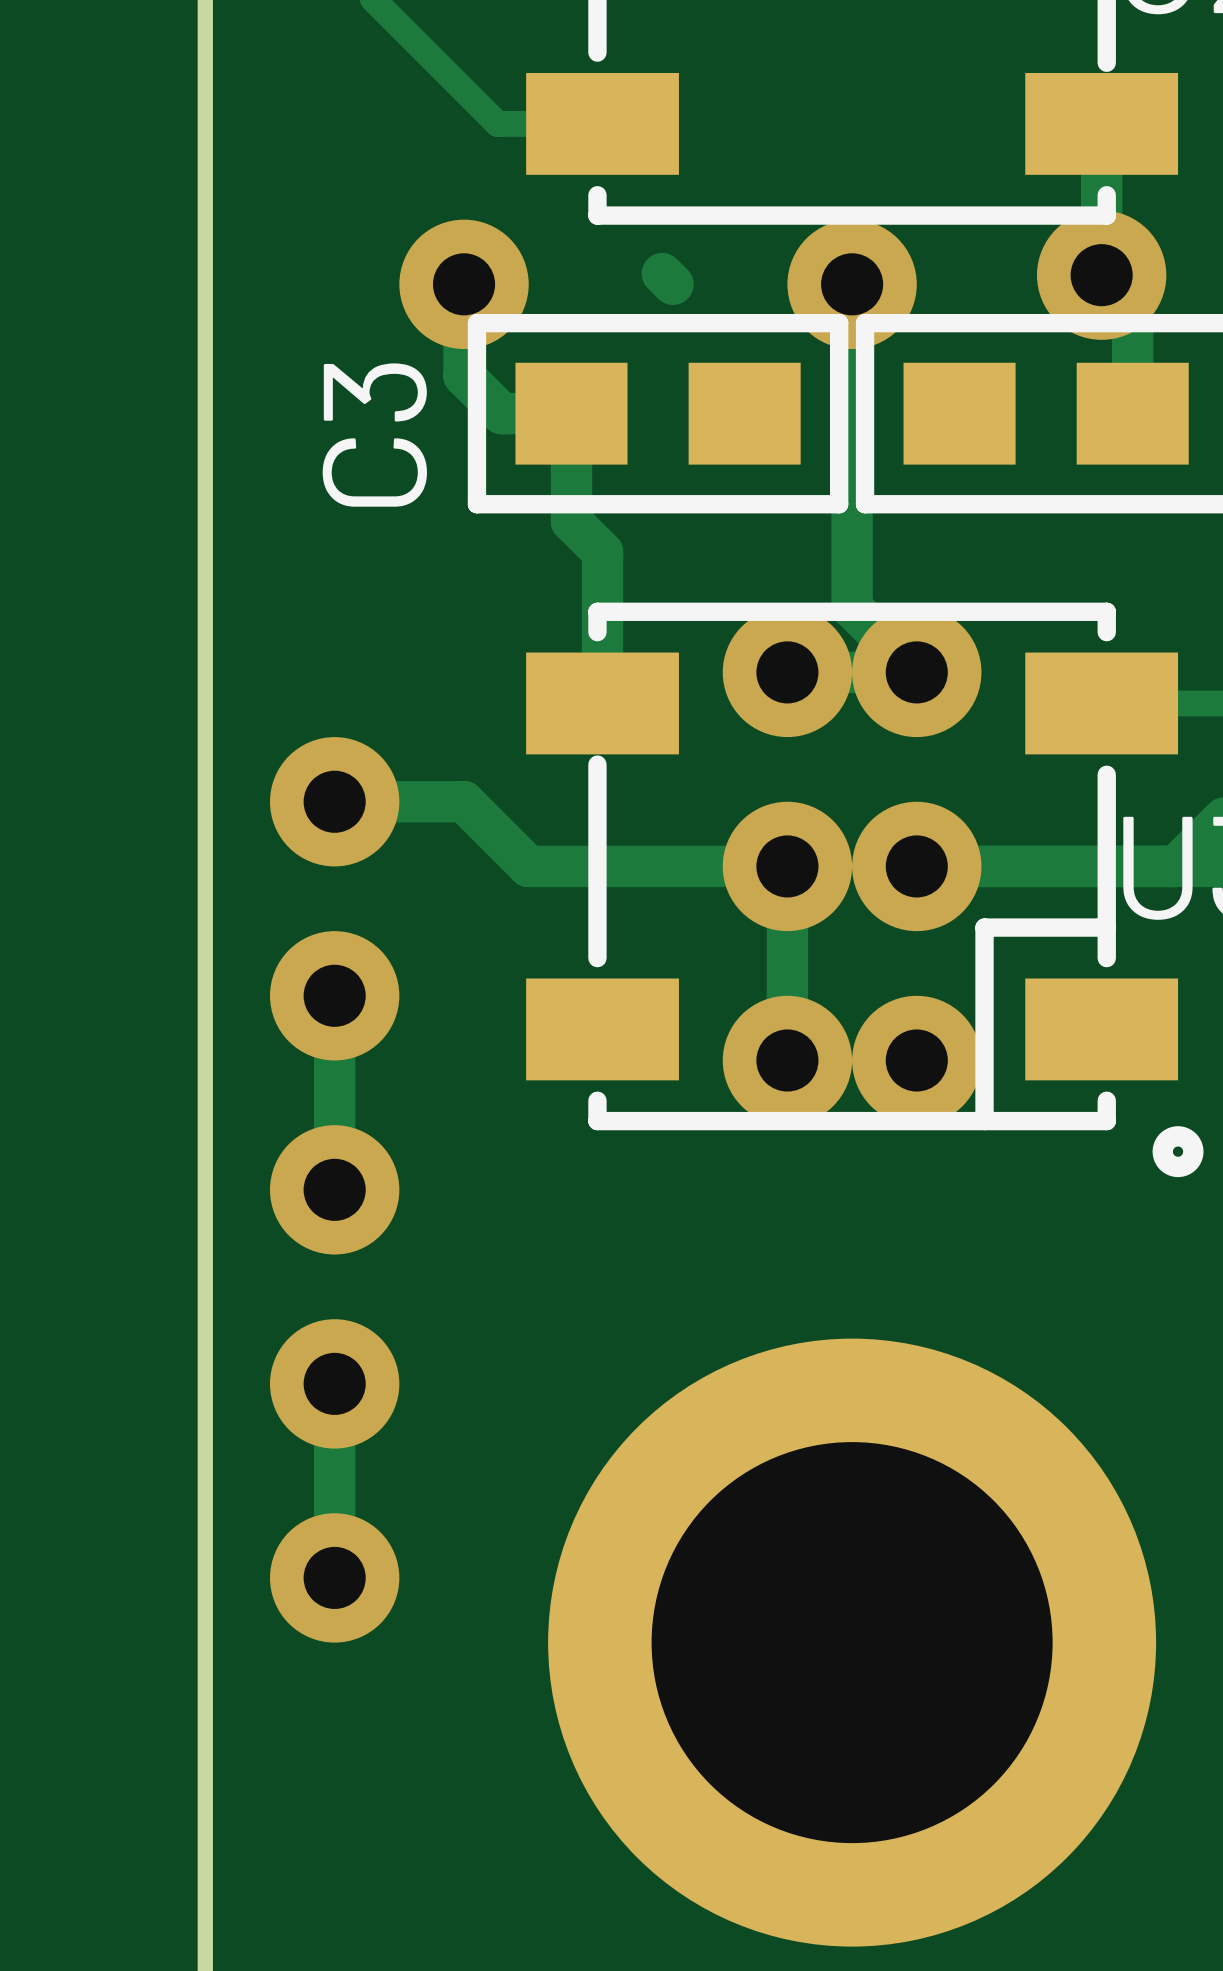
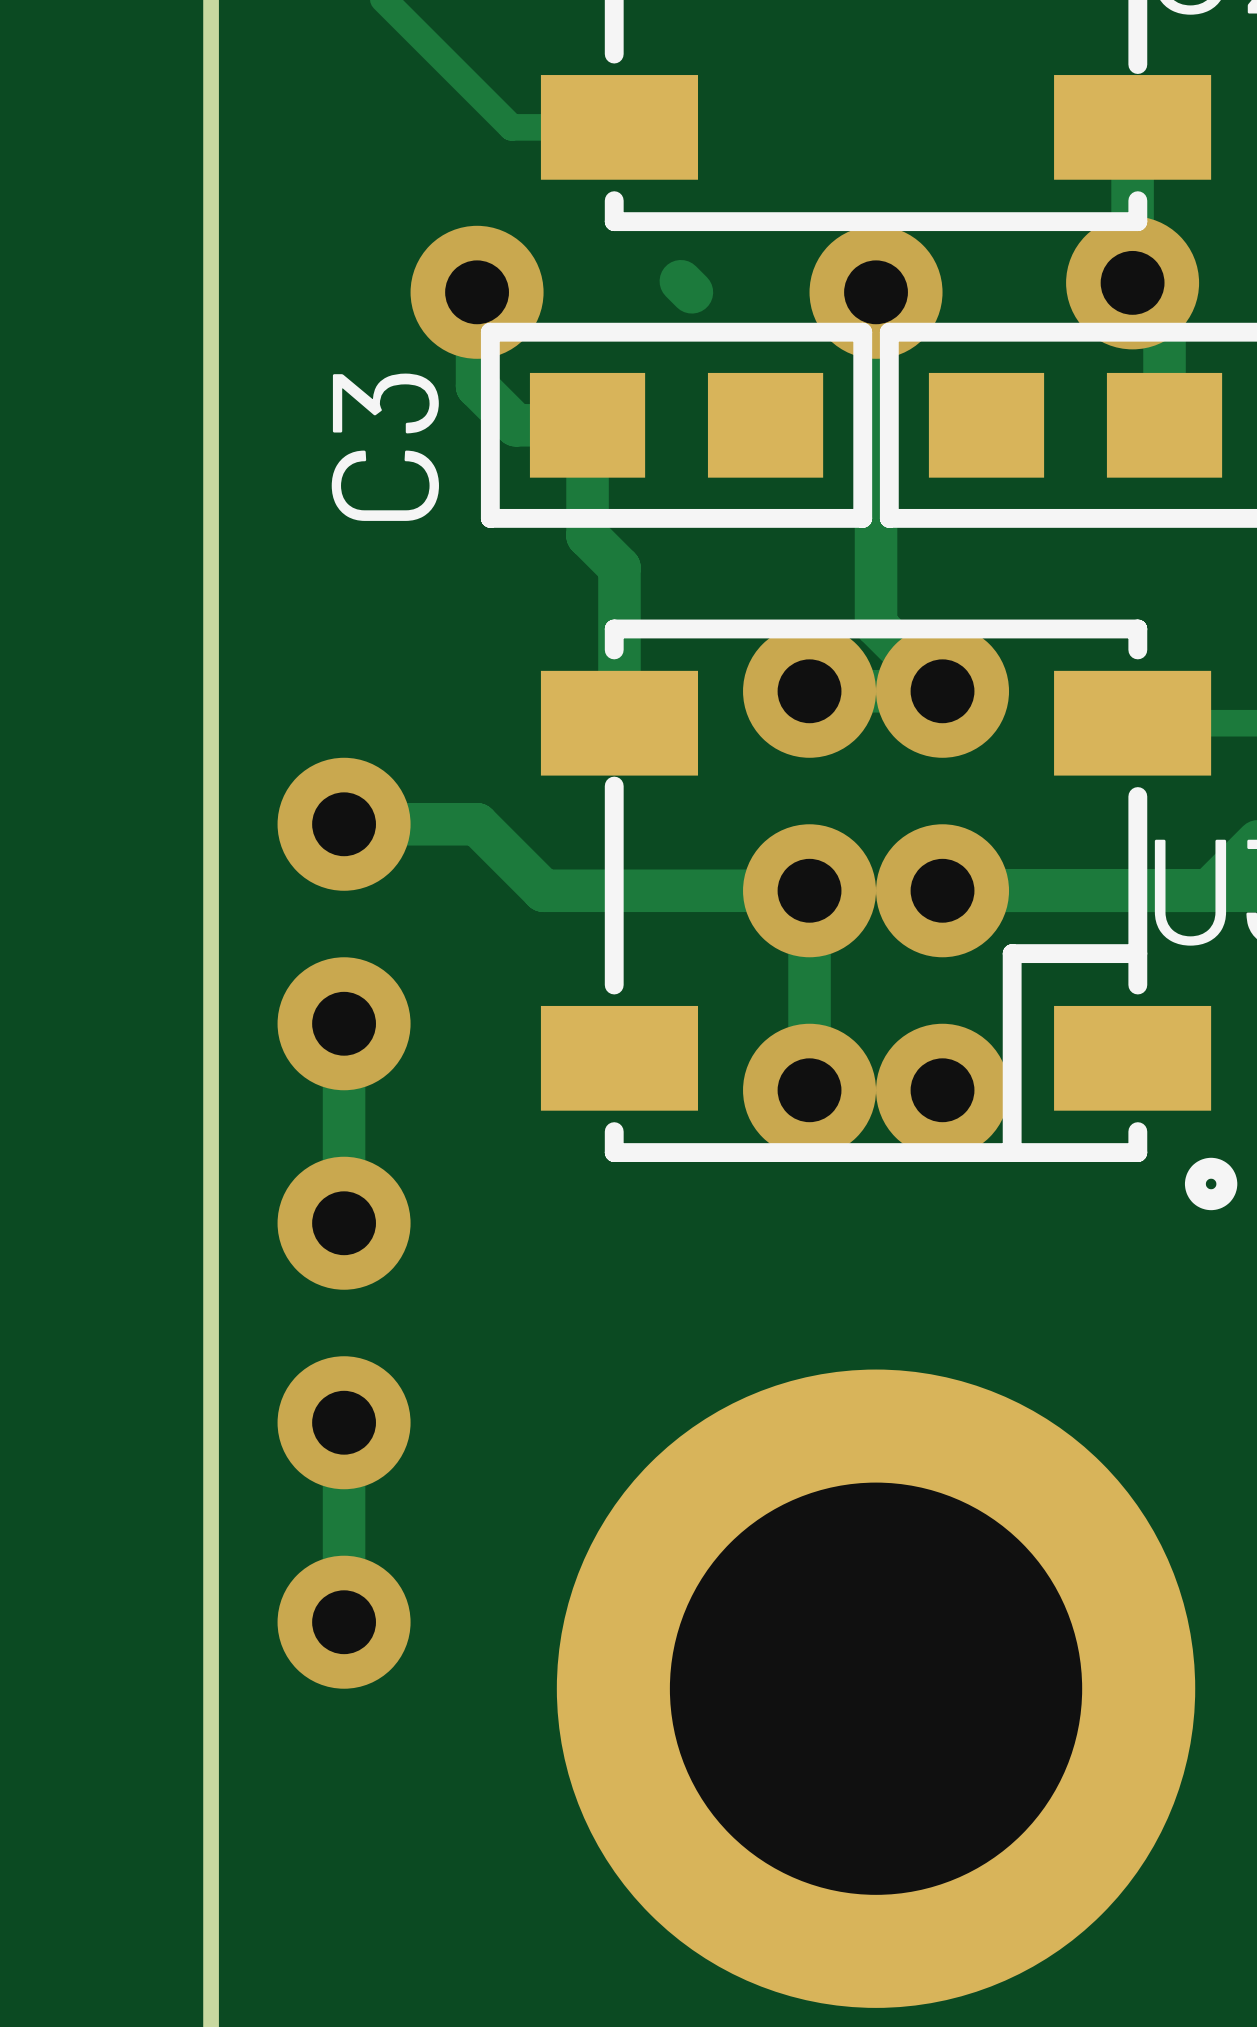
part footprint: [548, 1338, 1157, 1947] -> [556, 1369, 1196, 2008]

